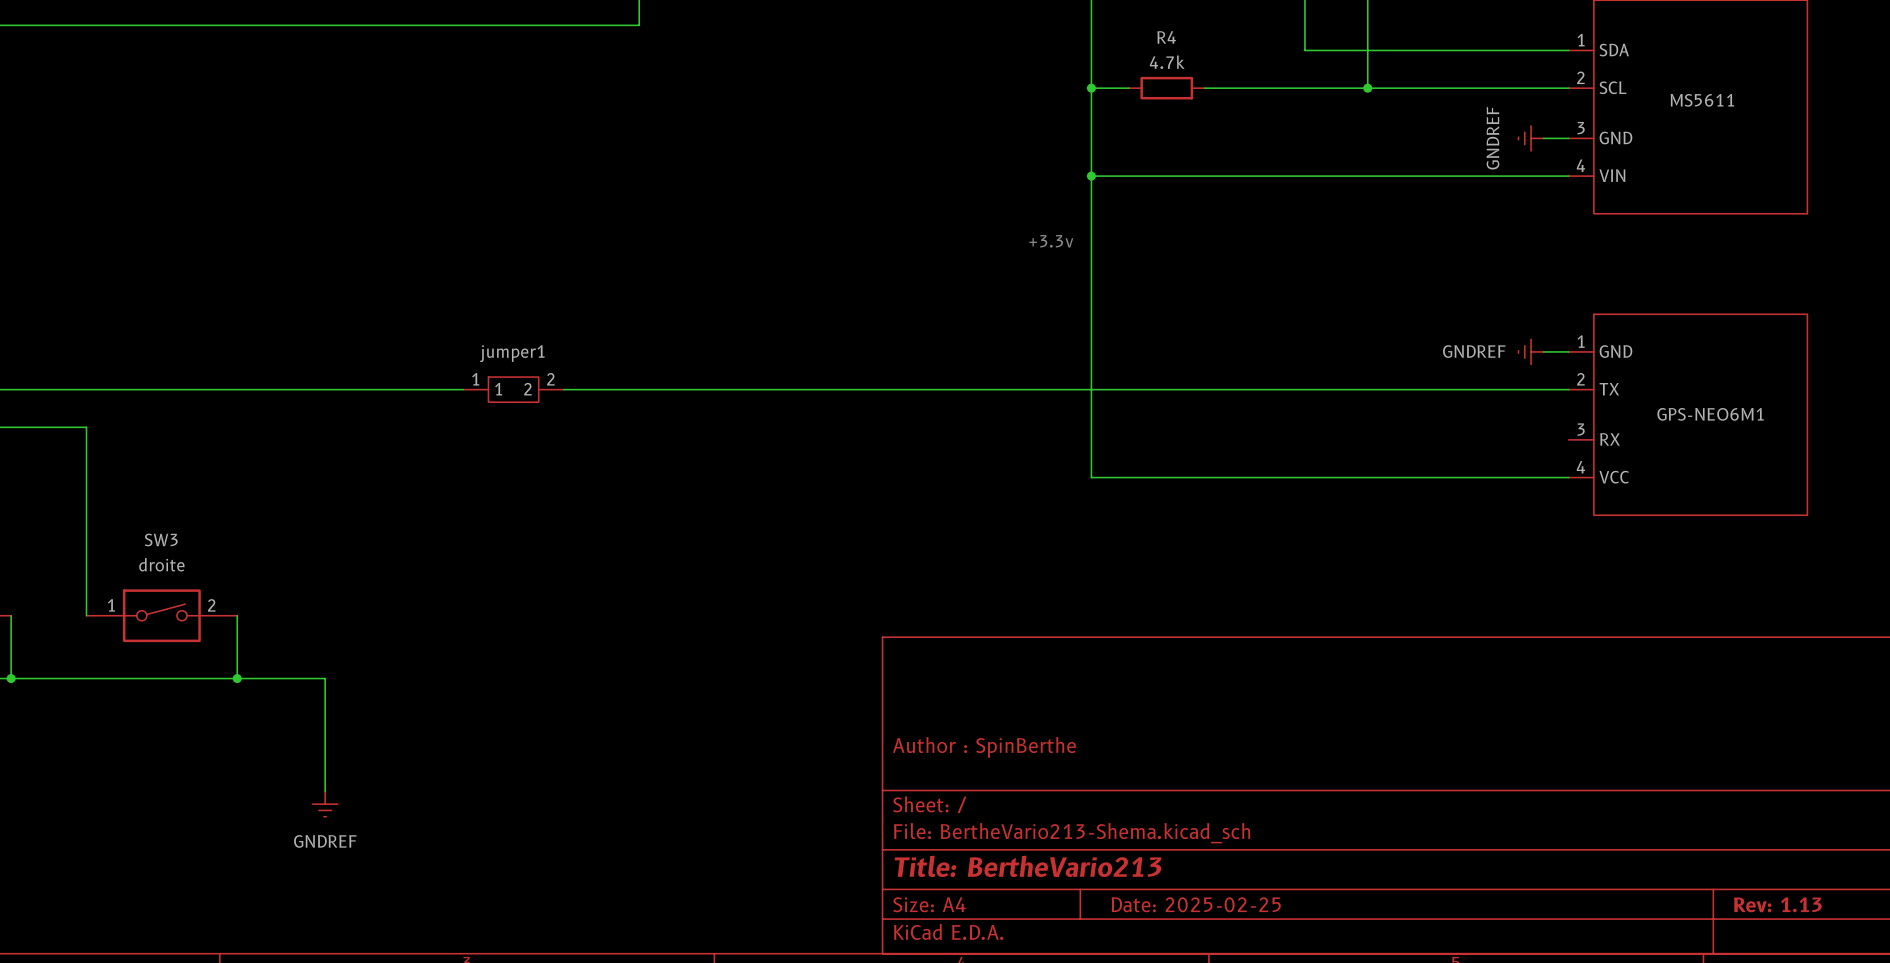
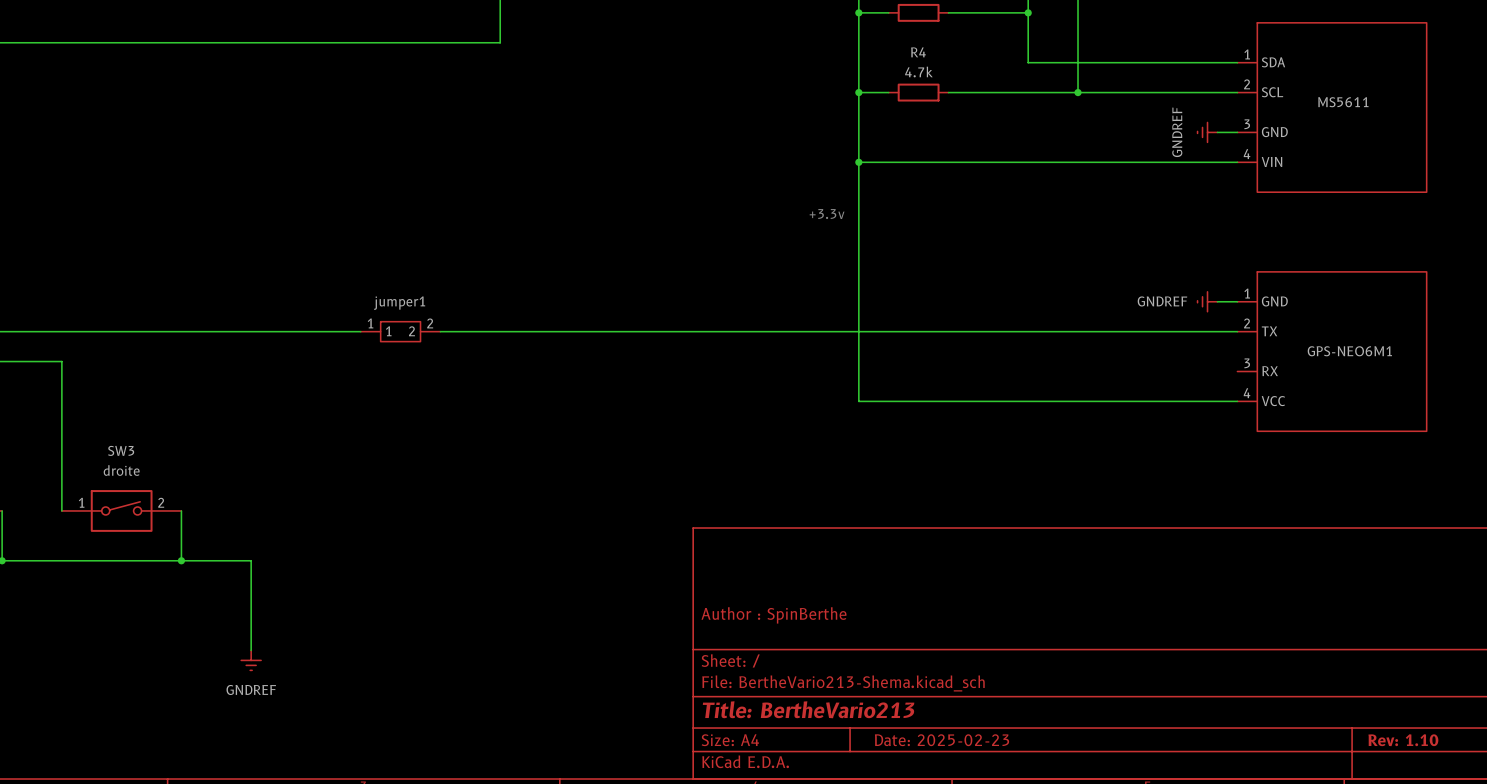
title block: Date: 2025-02-25 (1196, 904) -> Date: 2025-02-23 (942, 740)
title block: Rev: 1.13 (1777, 904) -> Rev: 1.10 (1403, 740)

